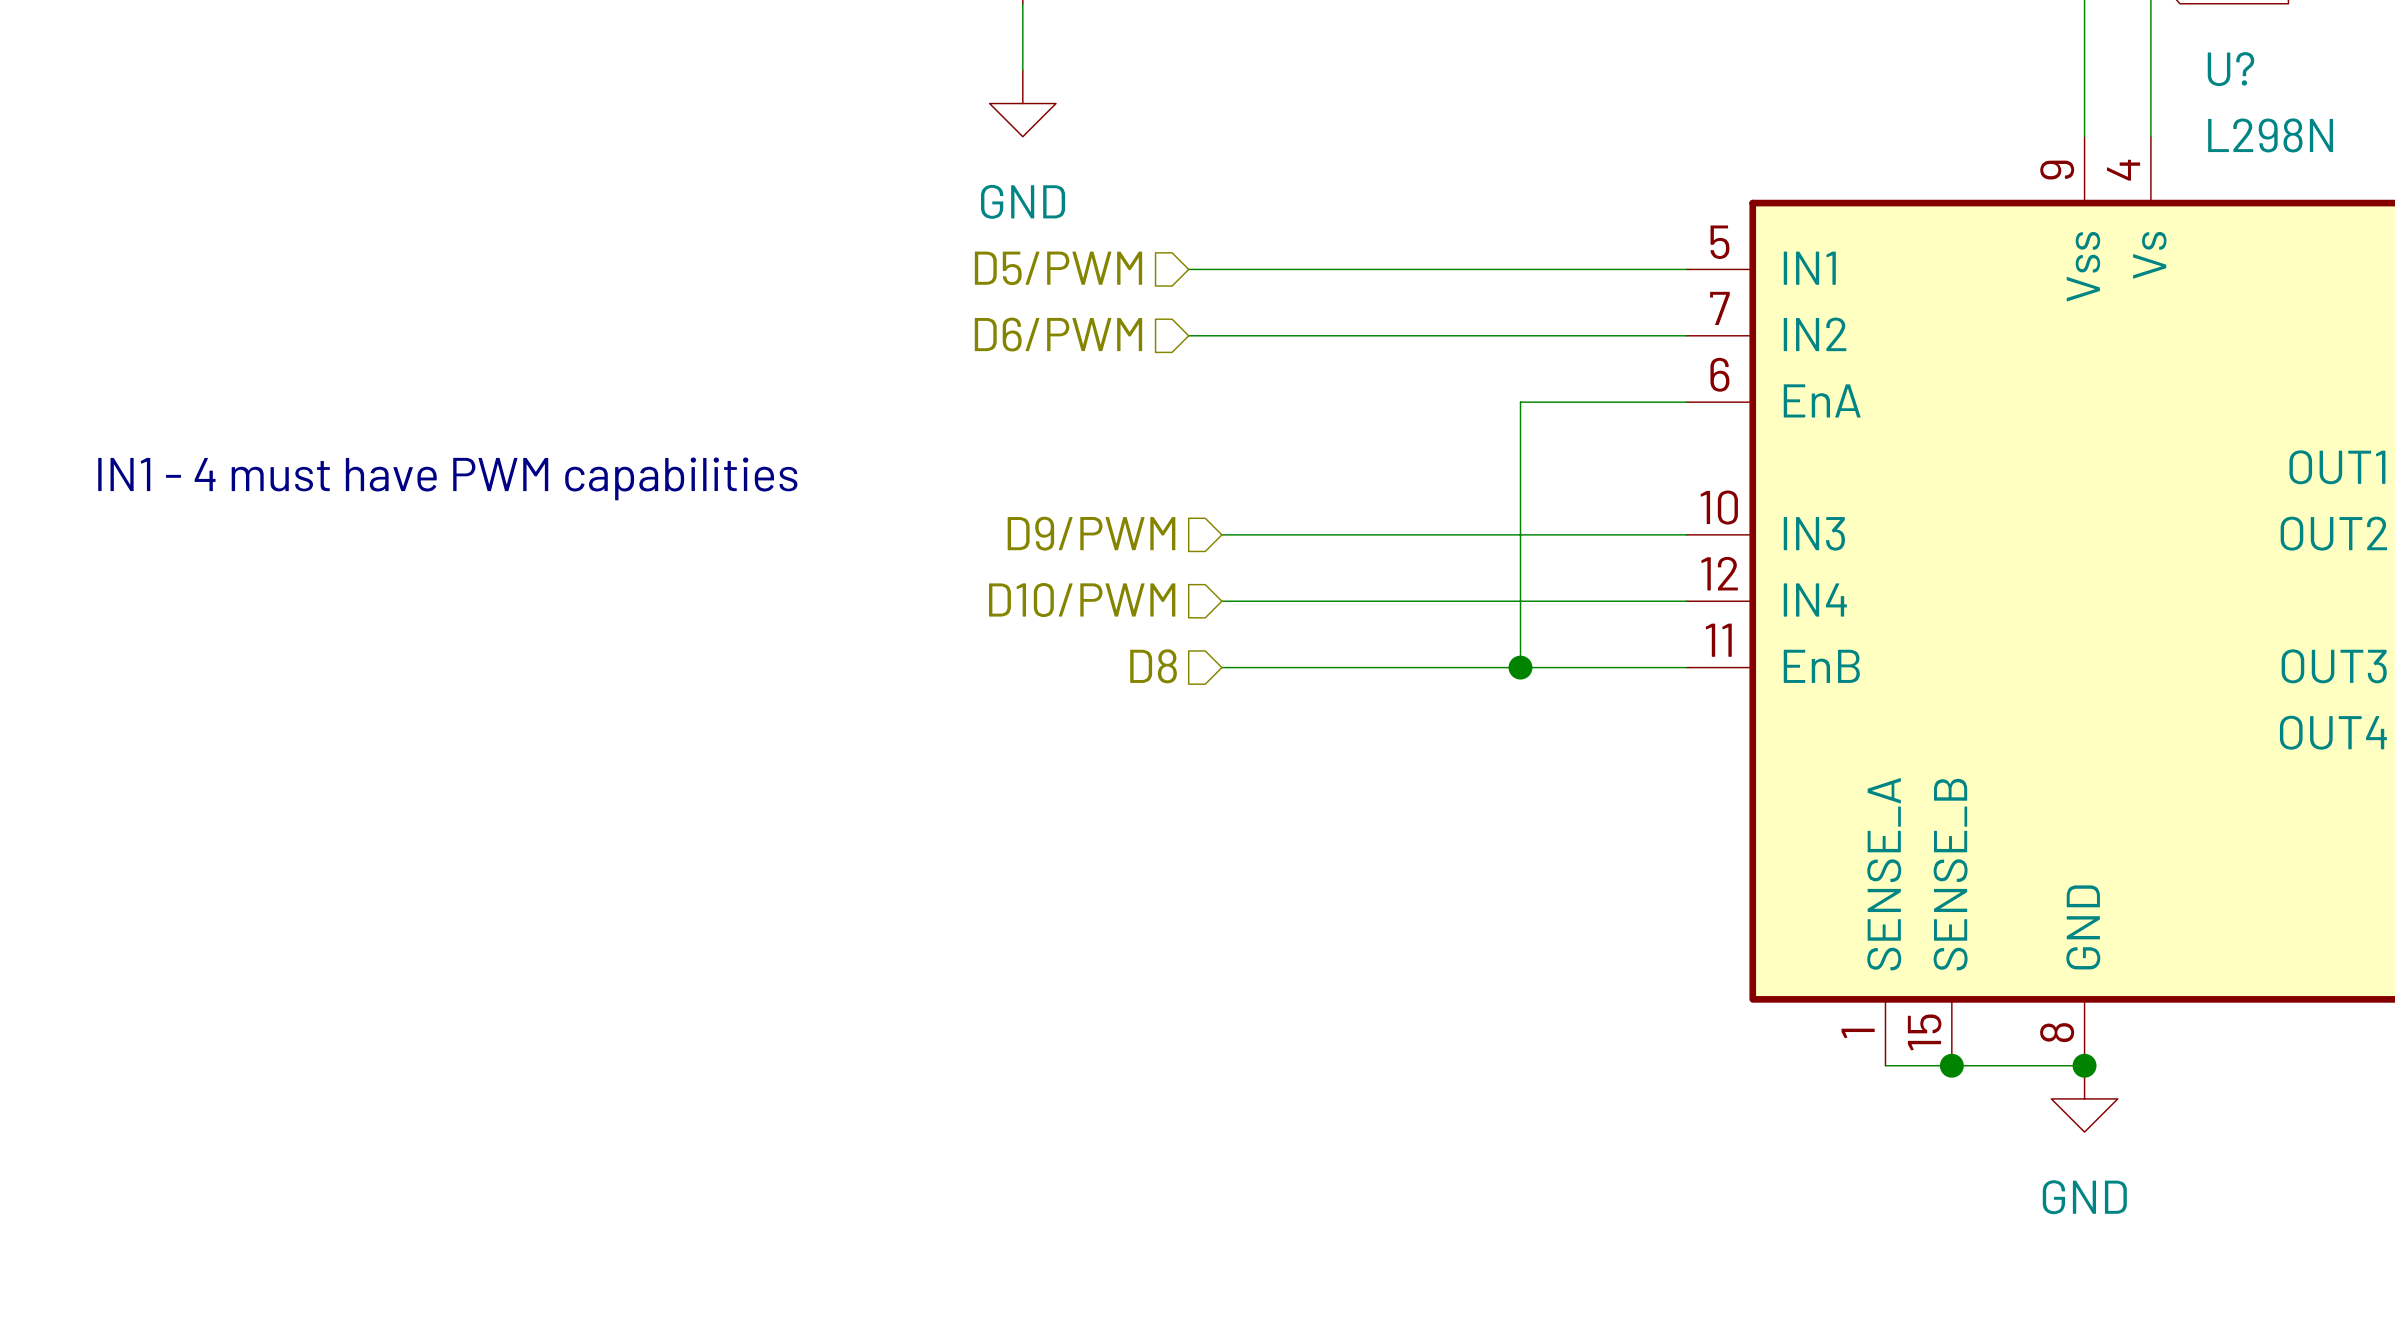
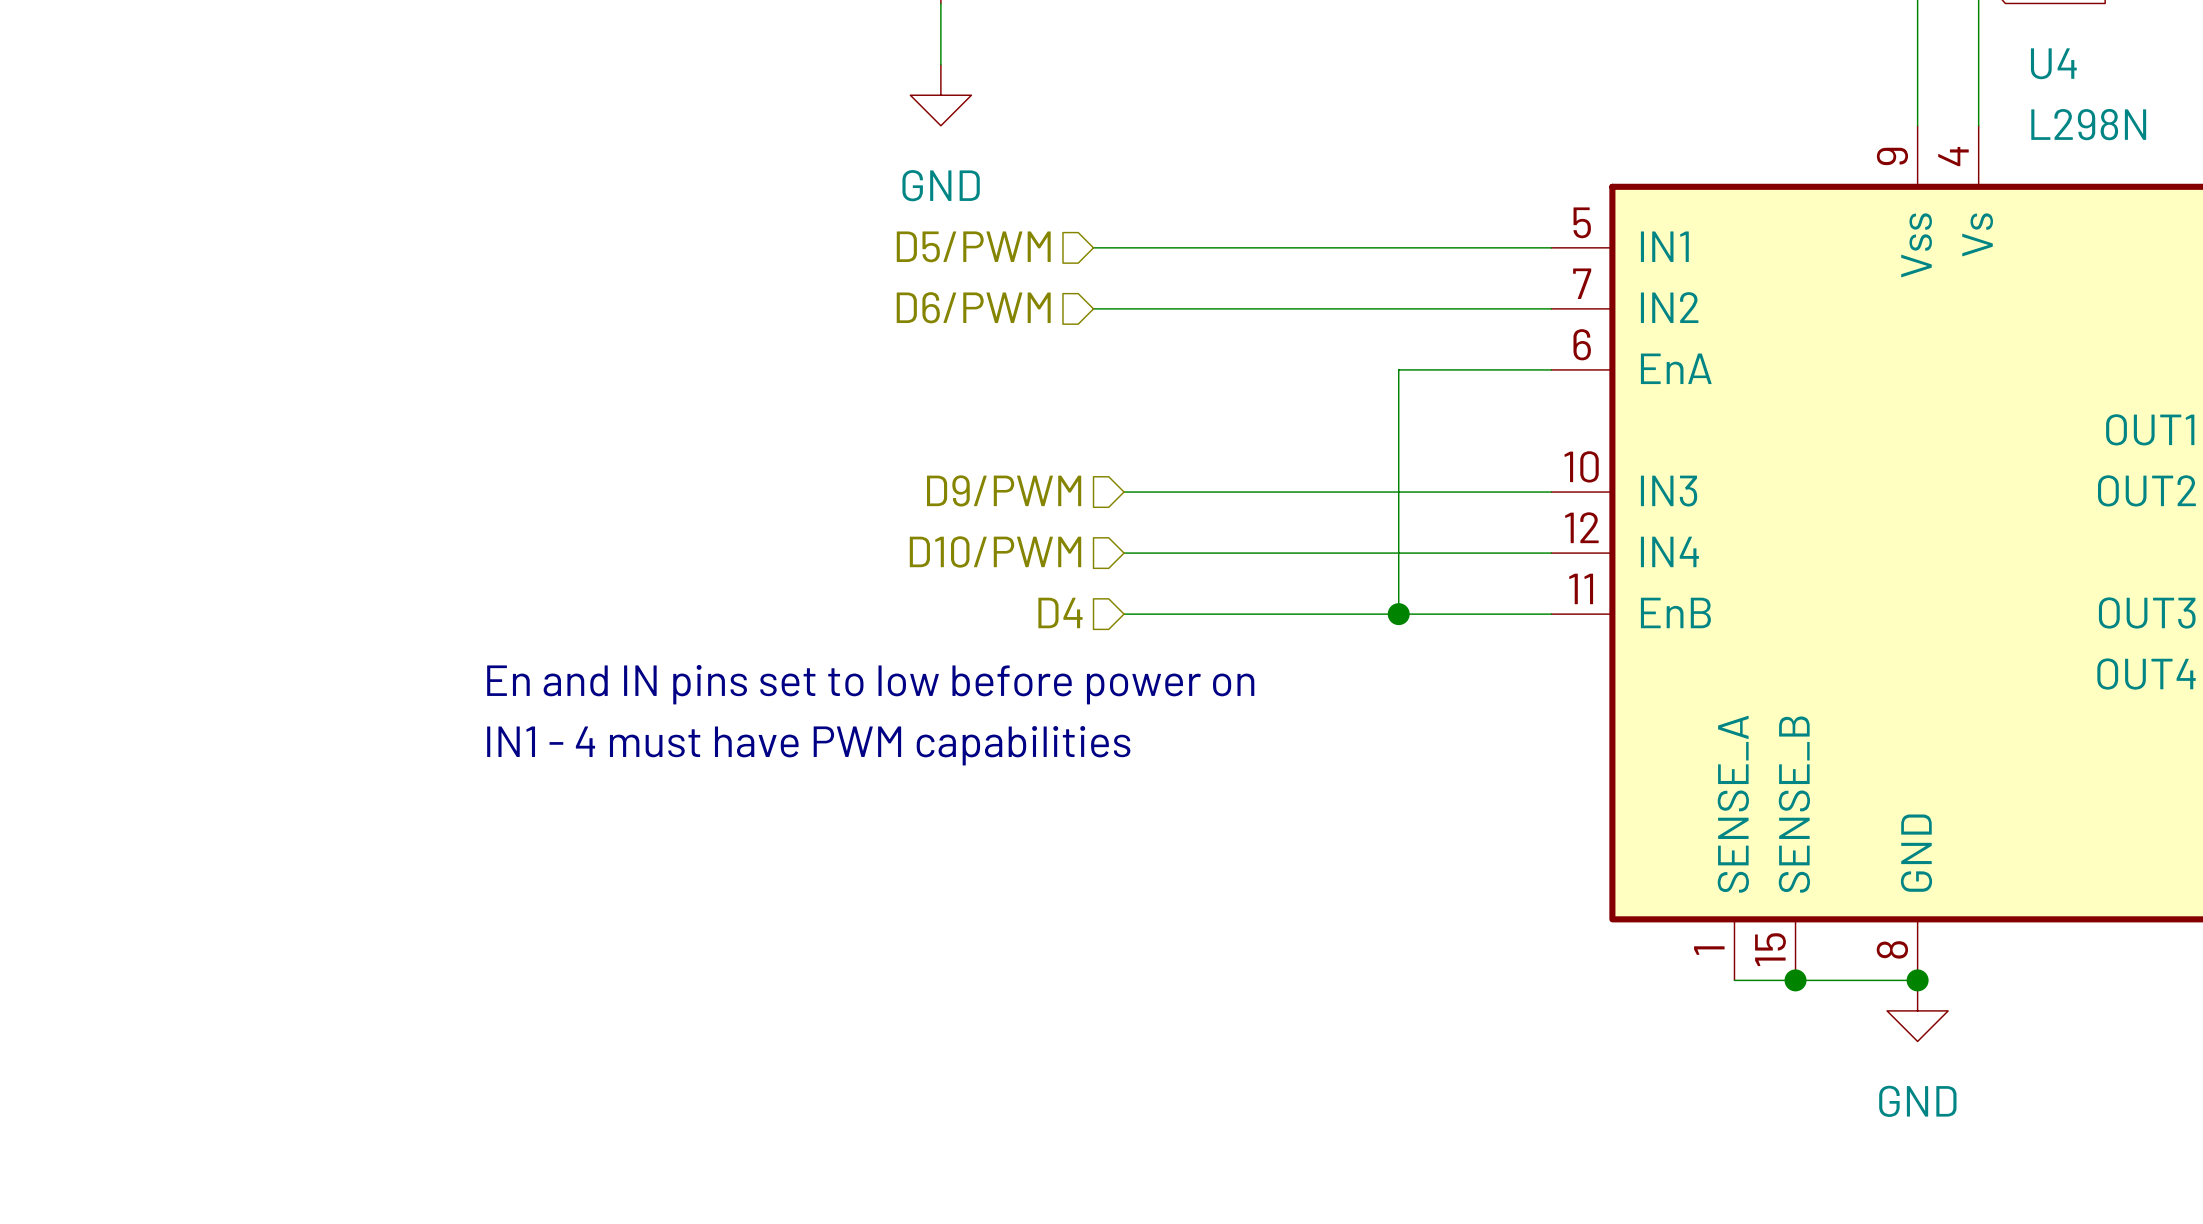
U? name: U? (2230, 69) -> U4 (2053, 63)
text position: IN1 - 4 must have PWM capabilities (447, 478) -> IN1 - 4 must have PWM capabilities (808, 745)
hierarchical label: D8 (1153, 666) -> D4 (1060, 612)
text: none -> En and IN pins set to low before power on (870, 684)

